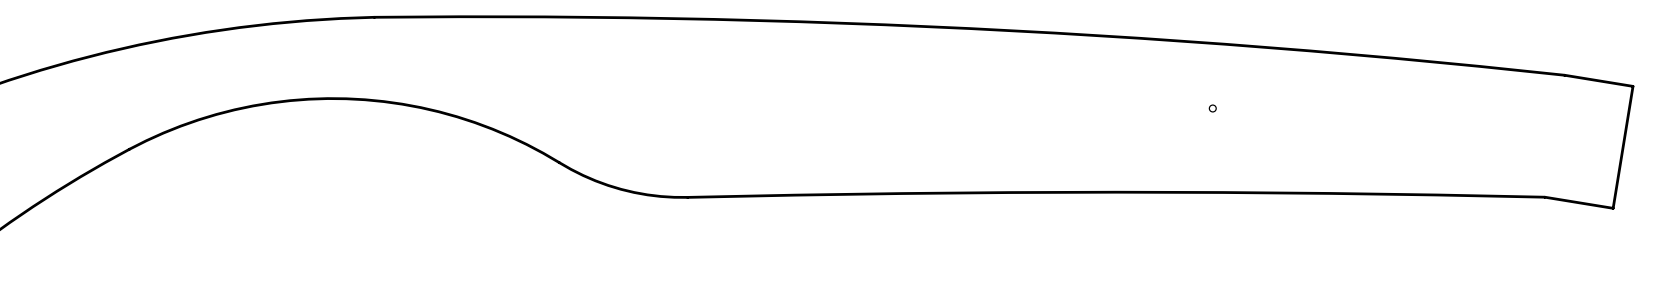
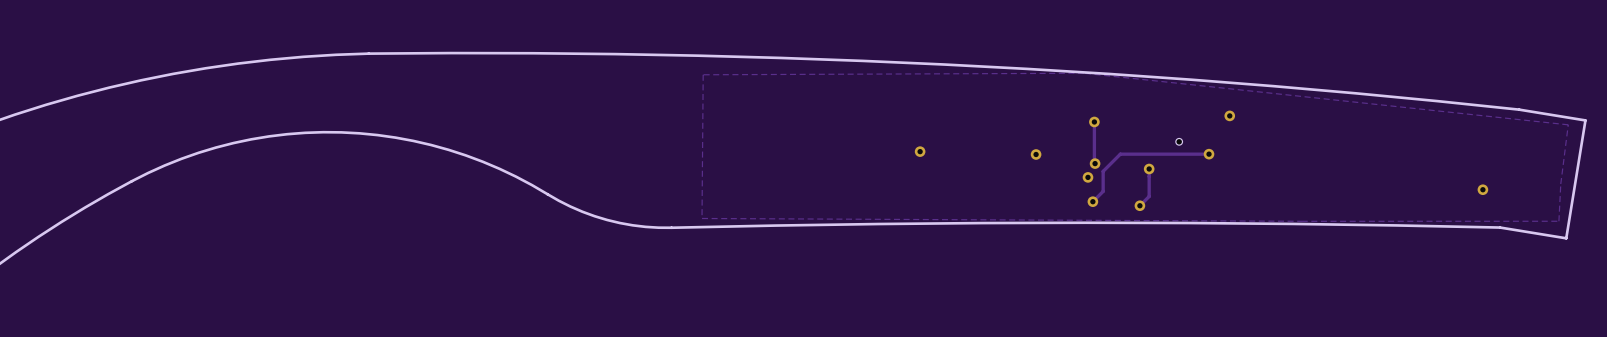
zone outline: none -> (1084, 73) (1568, 124) (1560, 183) (1558, 221) (702, 218) (703, 74) (1084, 73)
via: none -> (1229, 115)
track: none -> (1094, 121) (1095, 163)
via: none -> (1094, 121)
via: none -> (920, 151)
via: none -> (1036, 154)
track: none -> (1209, 154) (1120, 154) (1103, 171) (1103, 191) (1092, 201)
via: none -> (1209, 154)
via: none -> (1095, 163)
track: none -> (1149, 168) (1149, 196) (1139, 205)
via: none -> (1149, 168)
via: none -> (1087, 177)
via: none -> (1482, 189)
via: none -> (1092, 201)
via: none -> (1139, 205)

